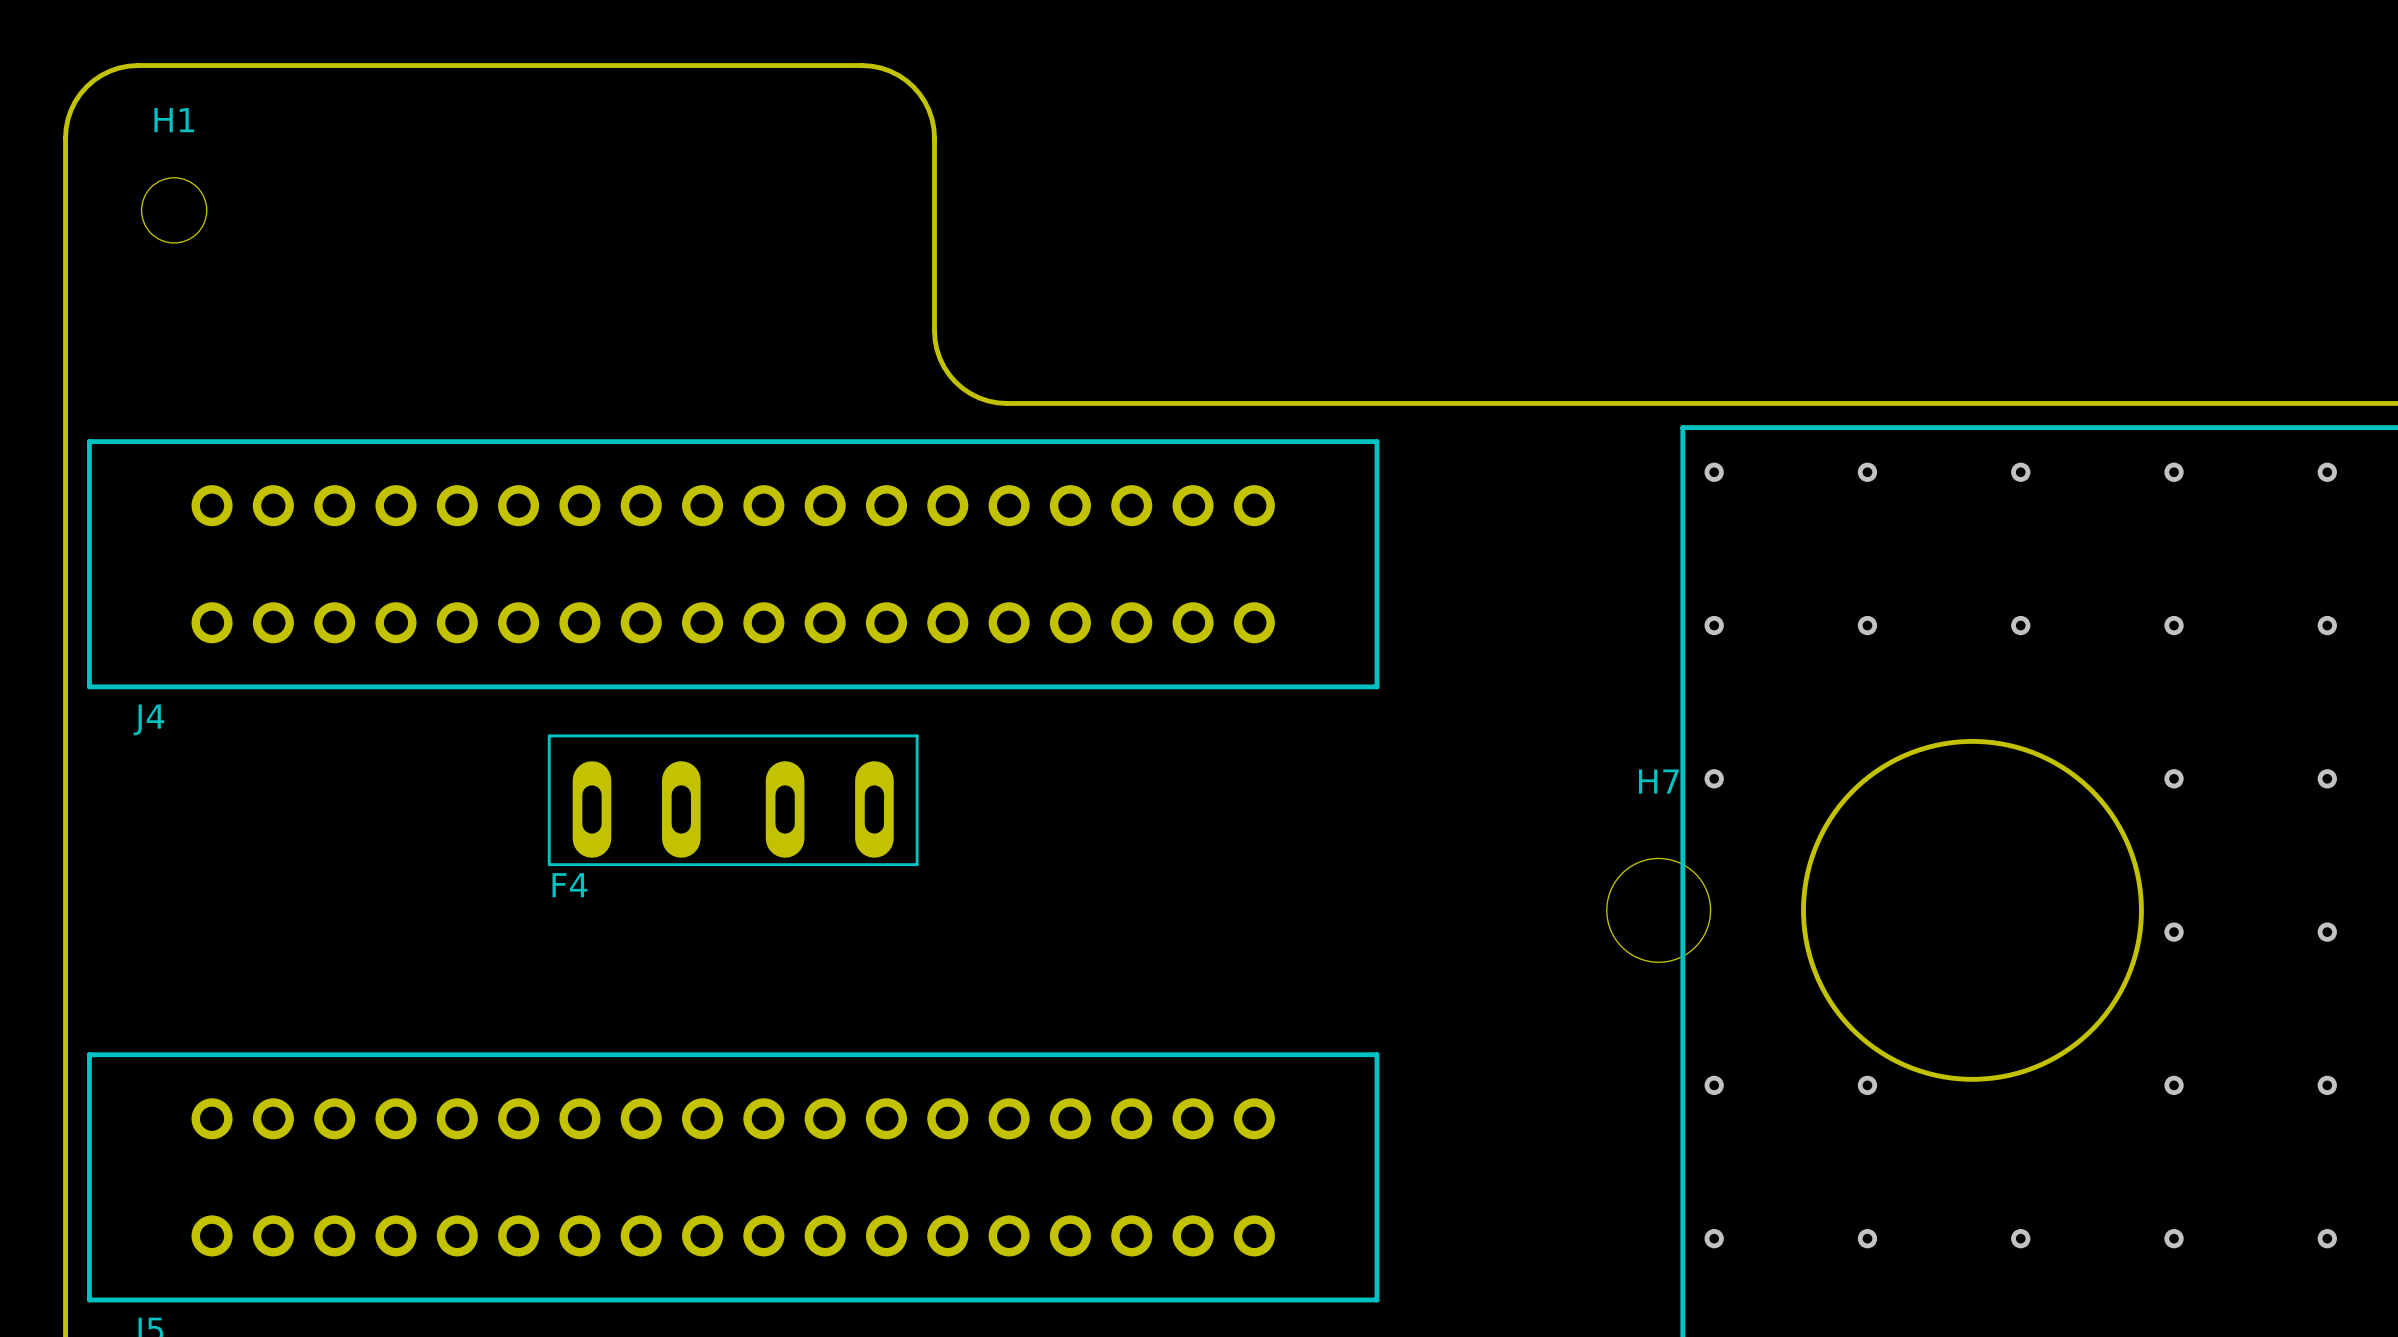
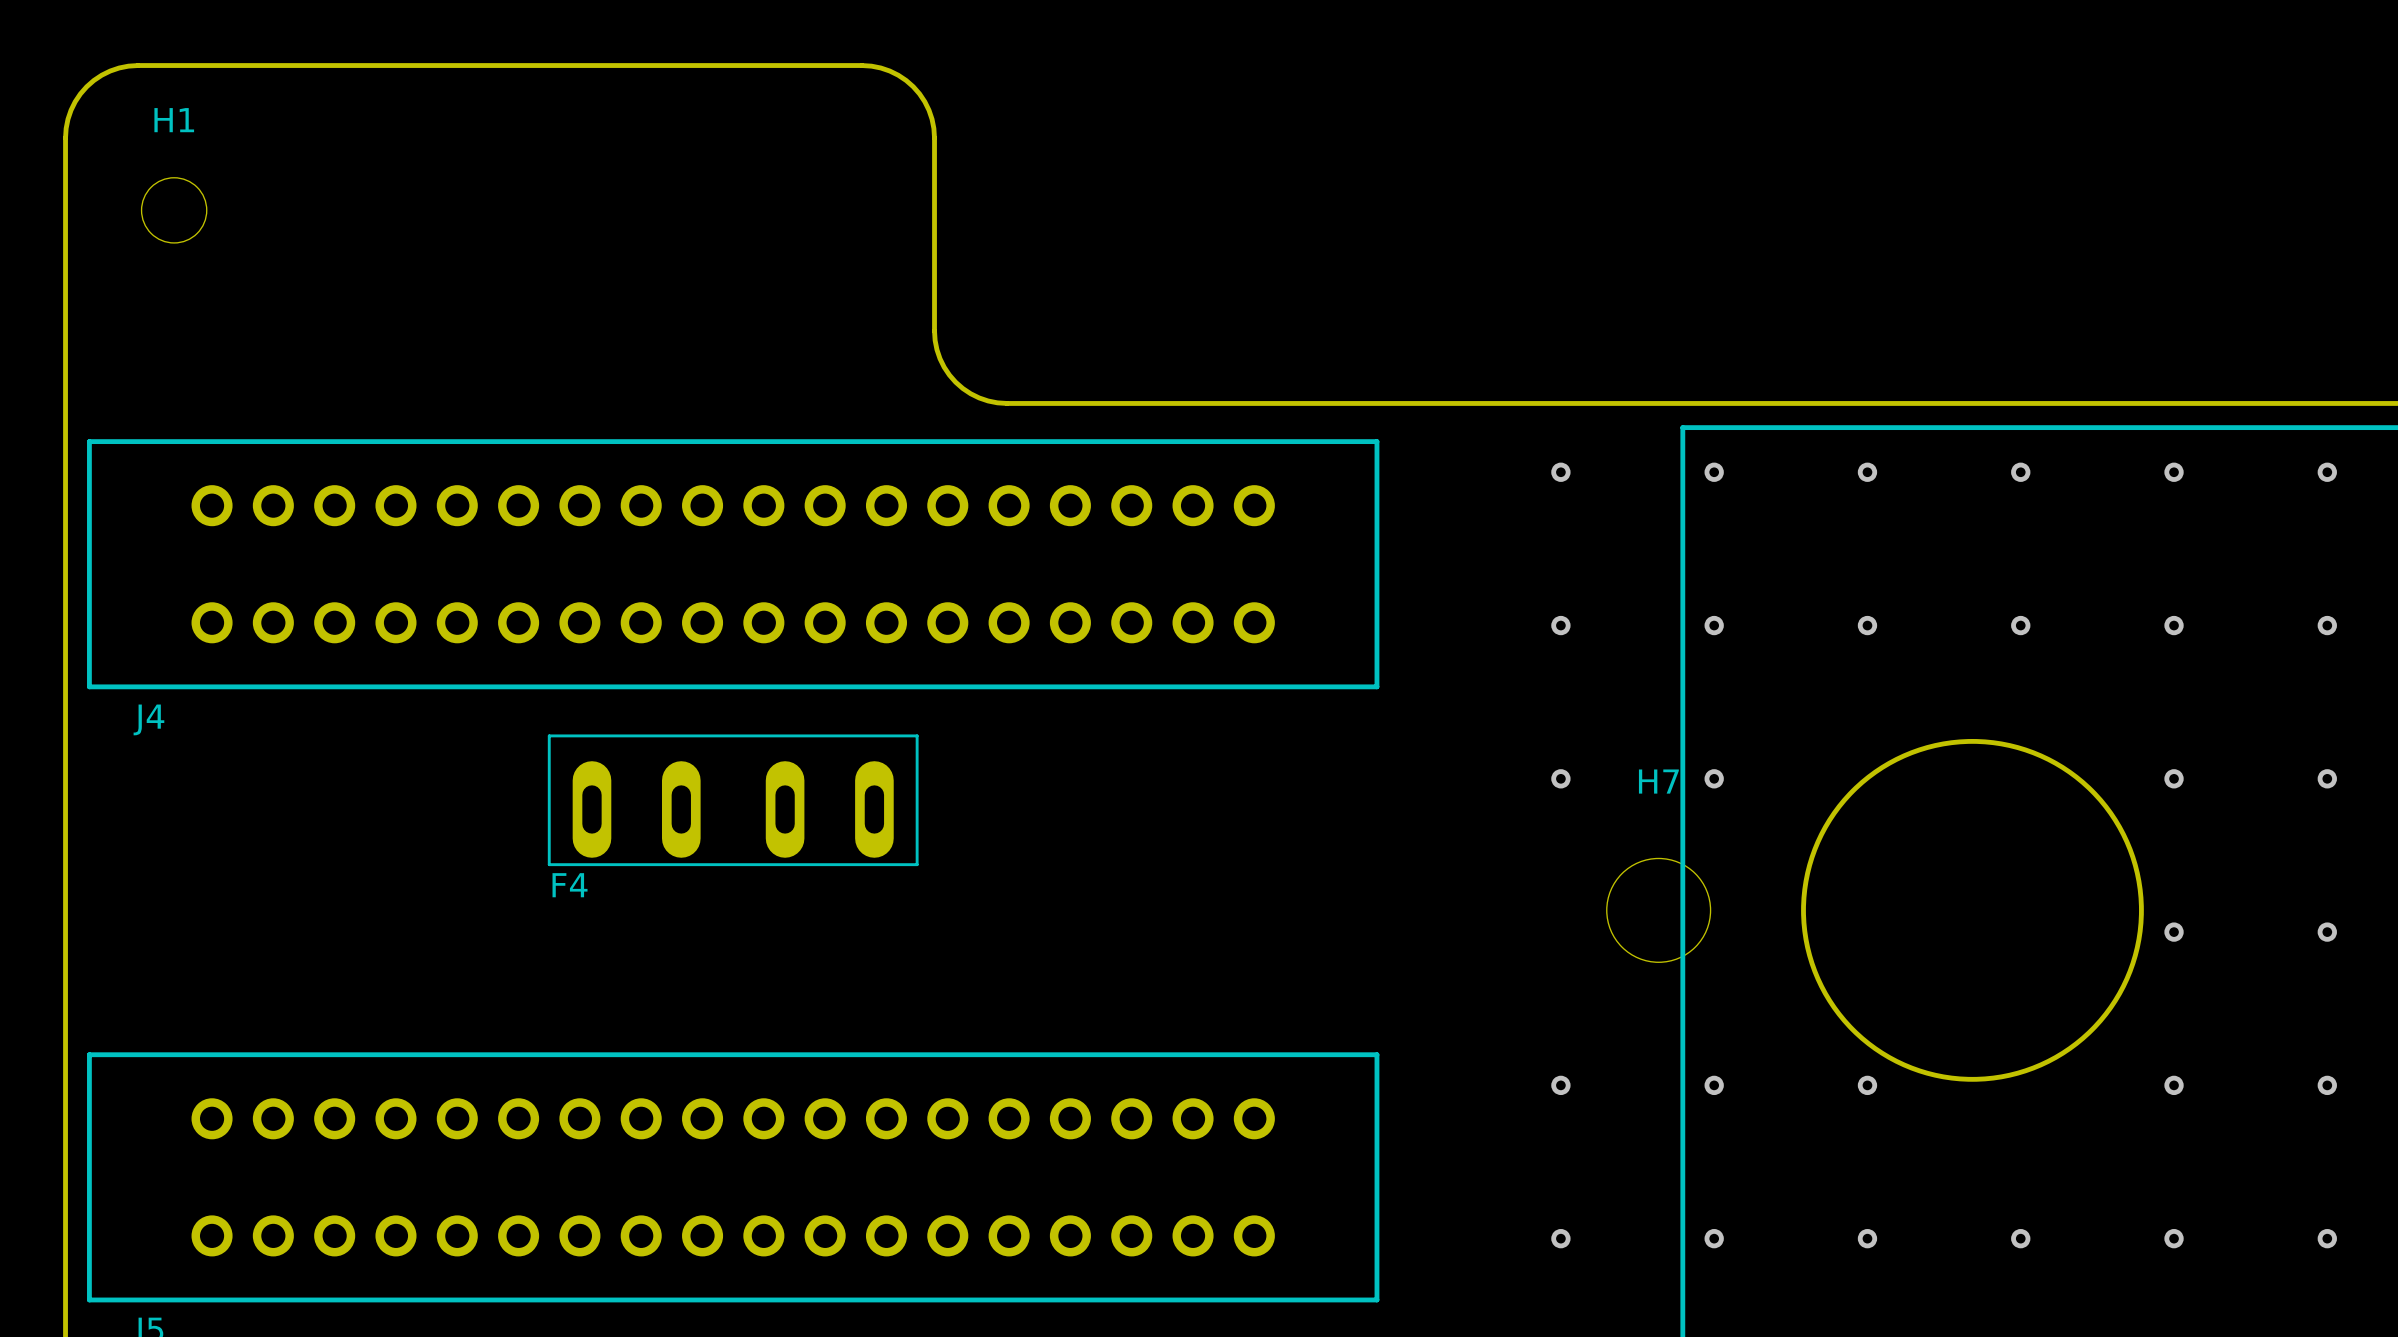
via: none -> (1560, 472)
via: none -> (1560, 625)
via: none -> (1560, 778)
via: none -> (1560, 1085)
via: none -> (1560, 1238)

